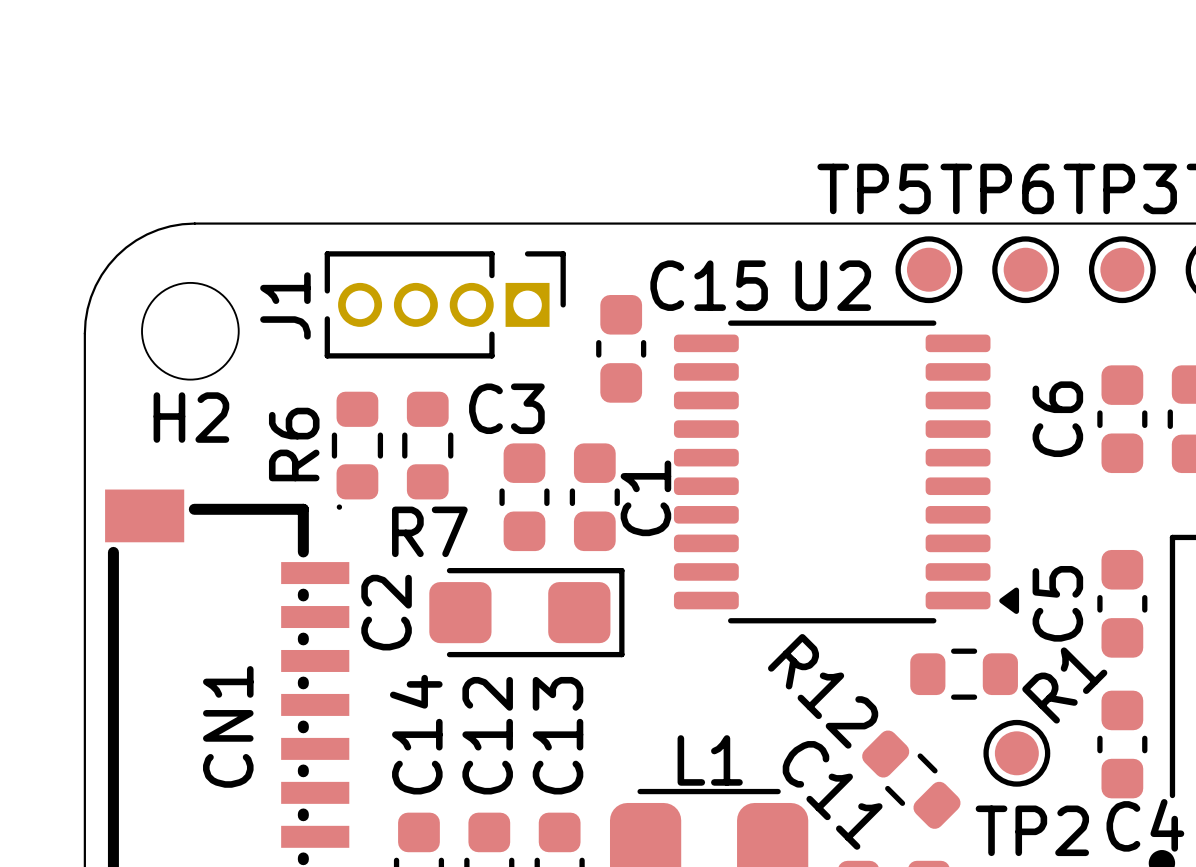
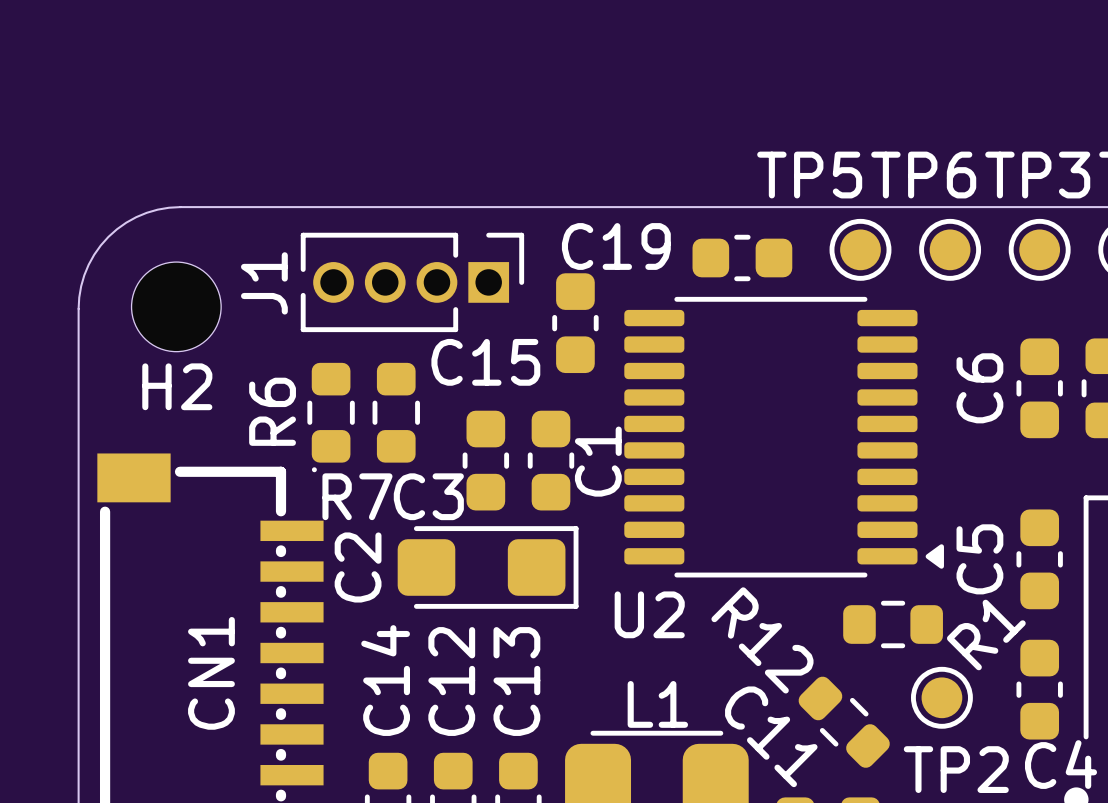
C19: none -> (742, 257)
C15 name position: C15 (709, 285) -> C15 (485, 362)
U2 name position: U2 (833, 285) -> U2 (649, 614)
C3 name position: C3 (506, 408) -> C3 (428, 496)
R7 name position: R7 (429, 531) -> R7 (357, 496)

